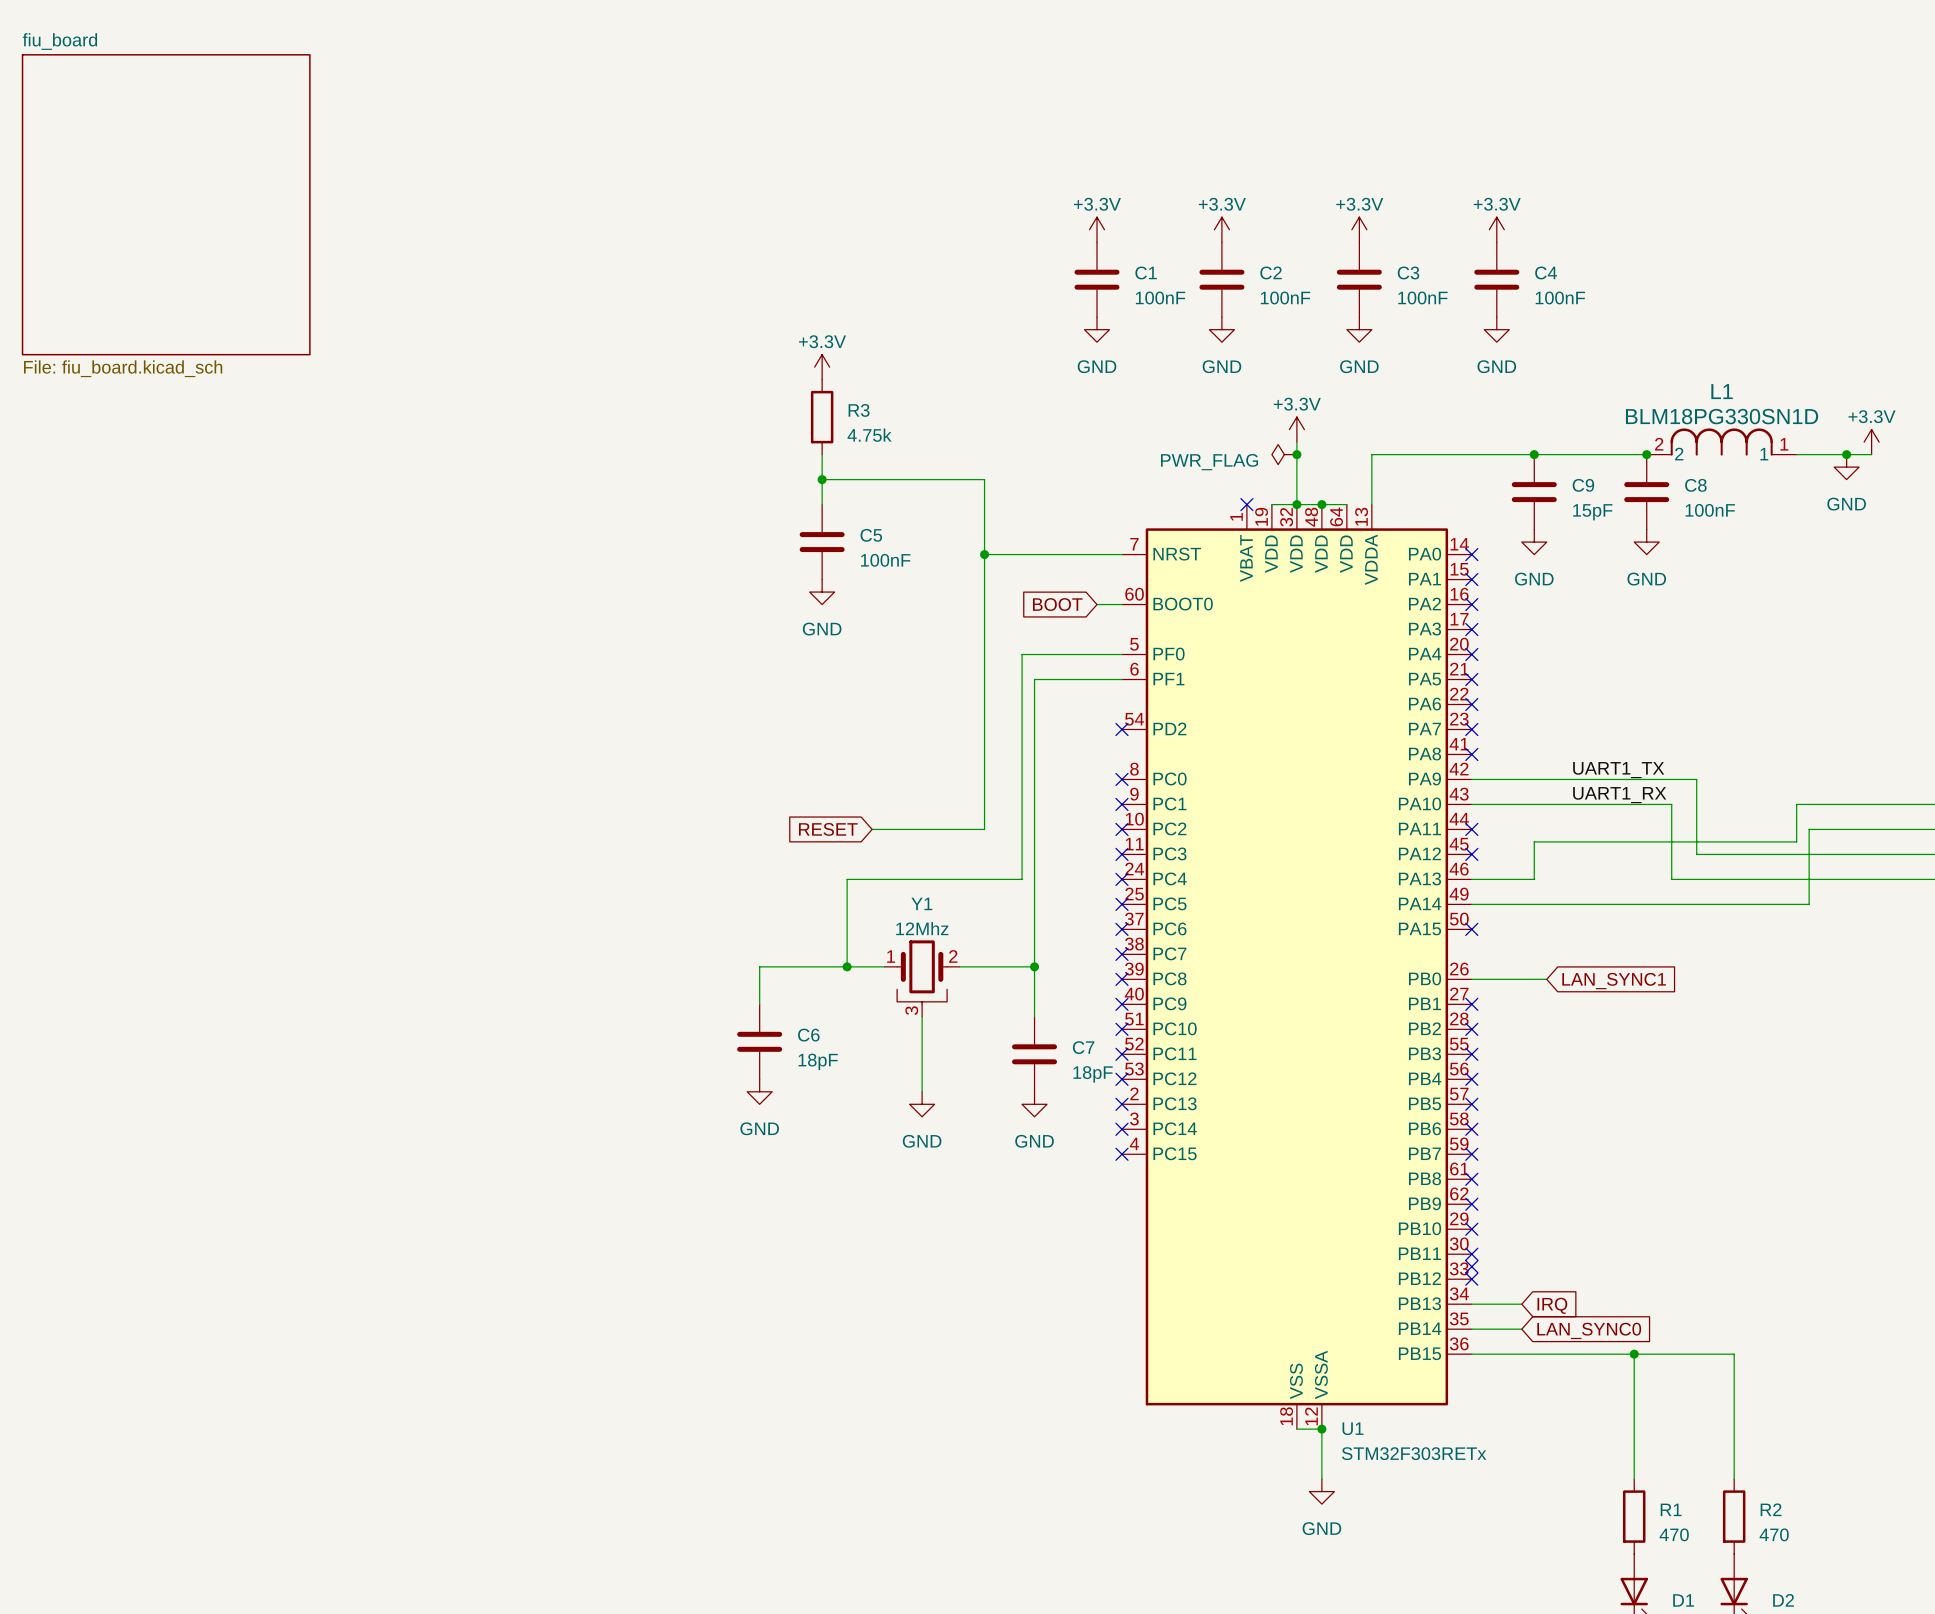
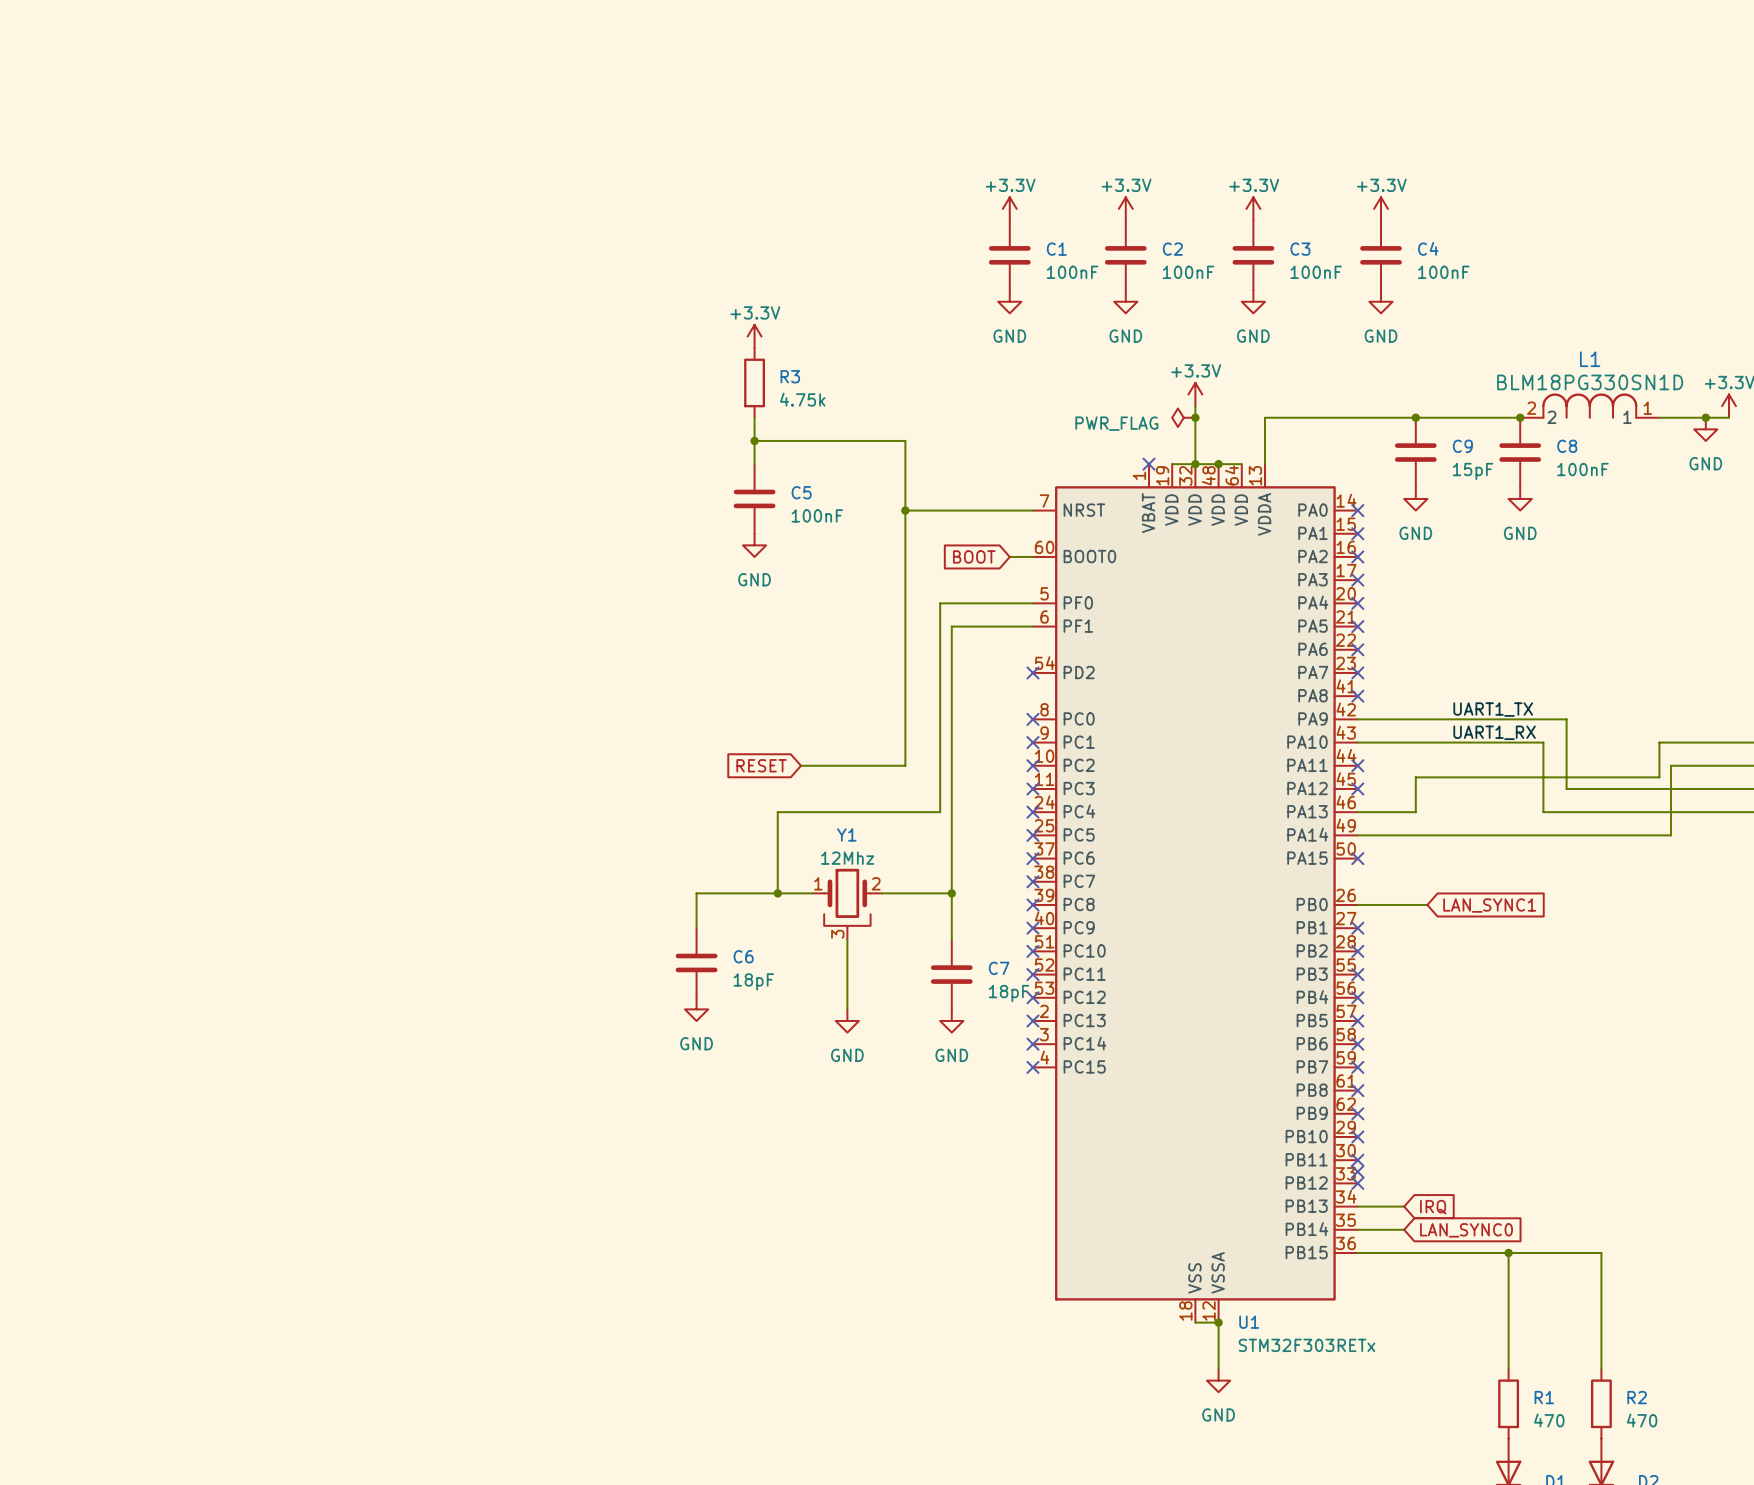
sheet fiu_board: File: fiu_board.kicad_sch (166, 204) -> none

